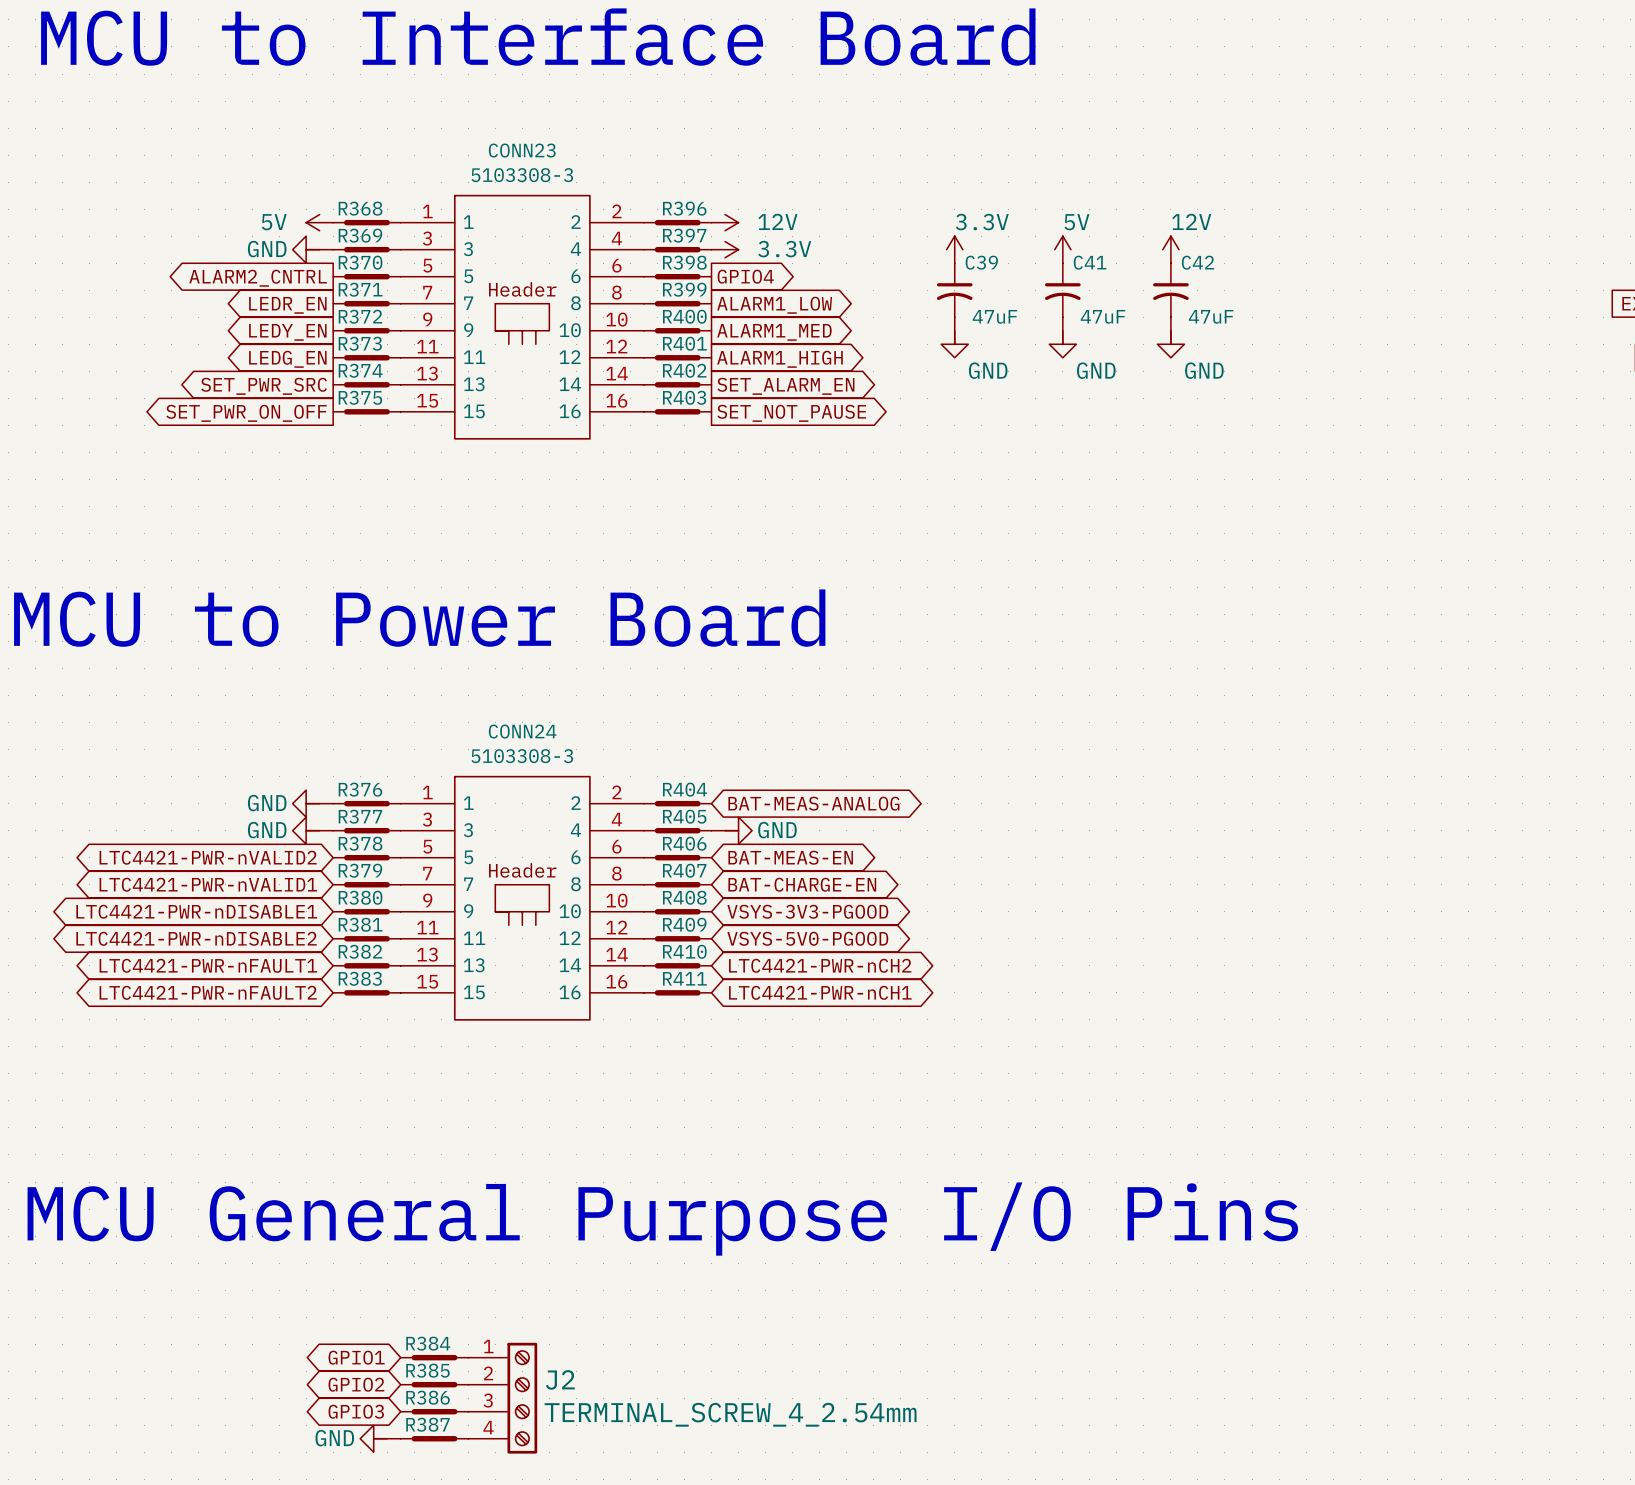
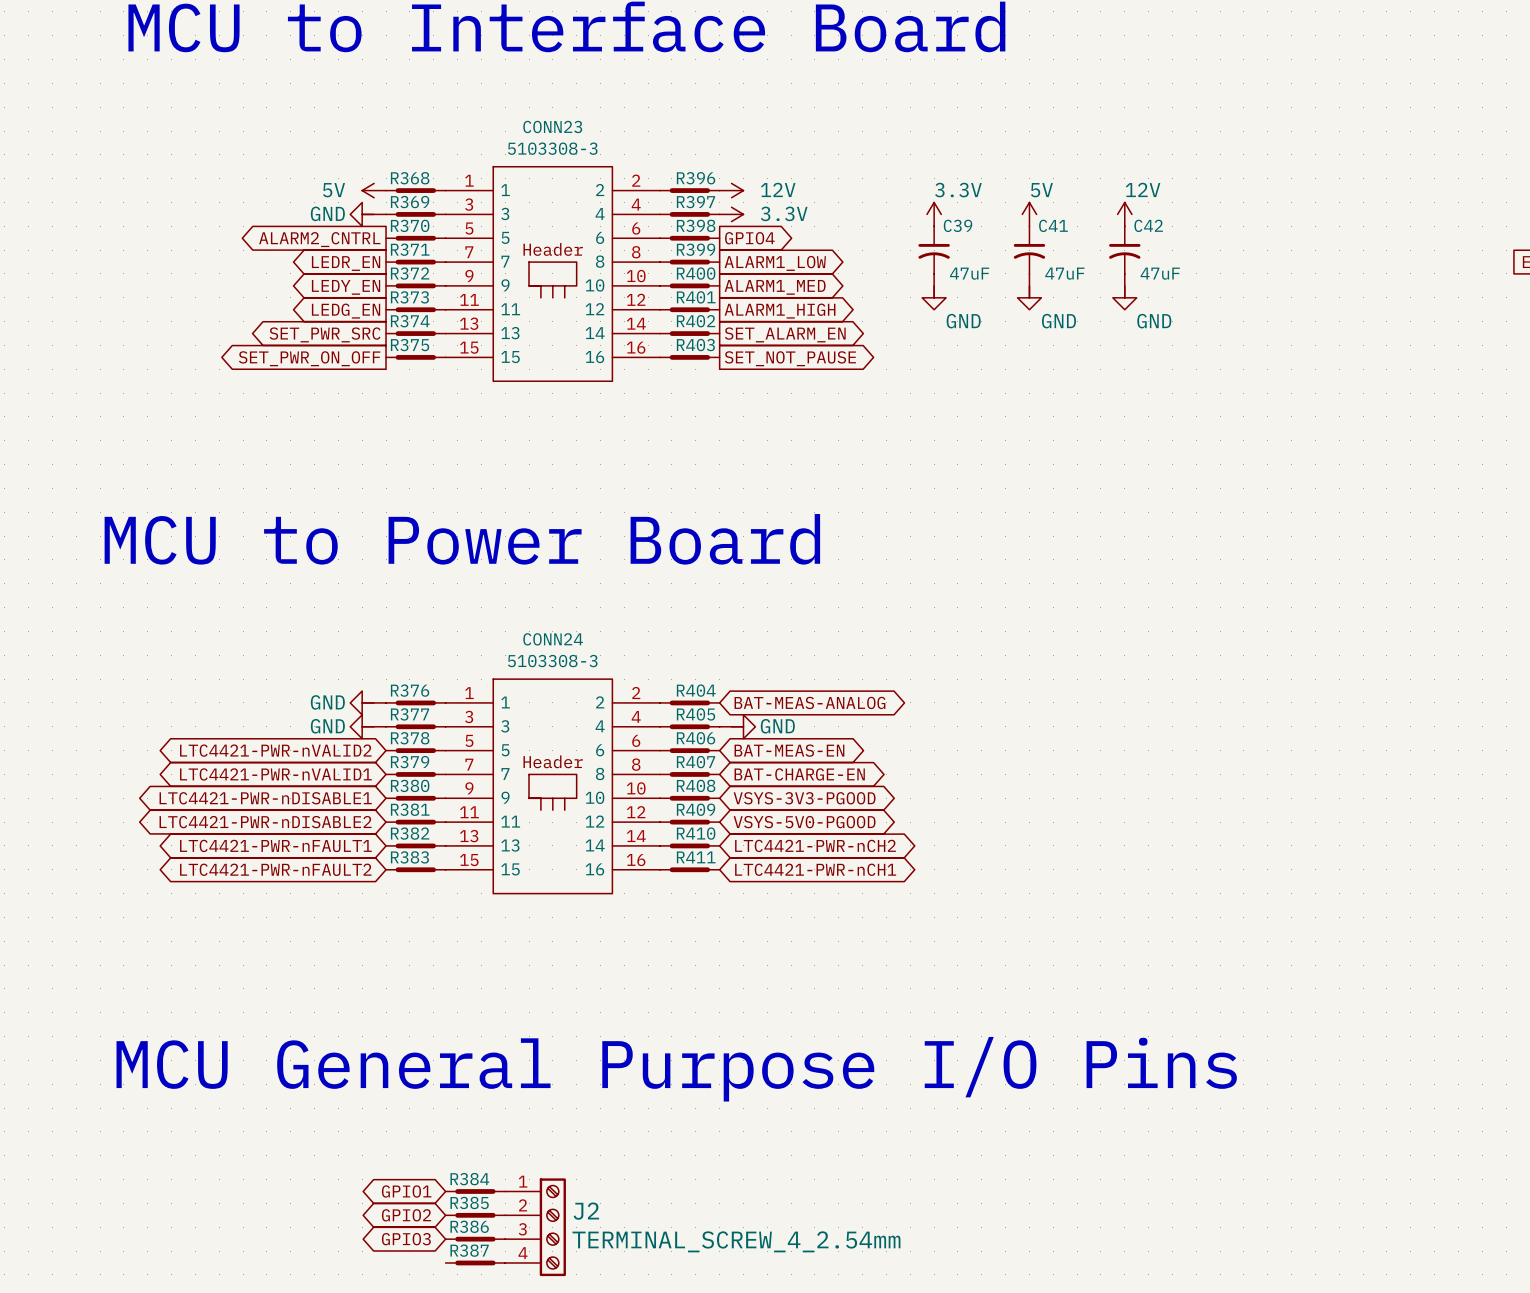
power symbol: GND (380, 1438) -> none

